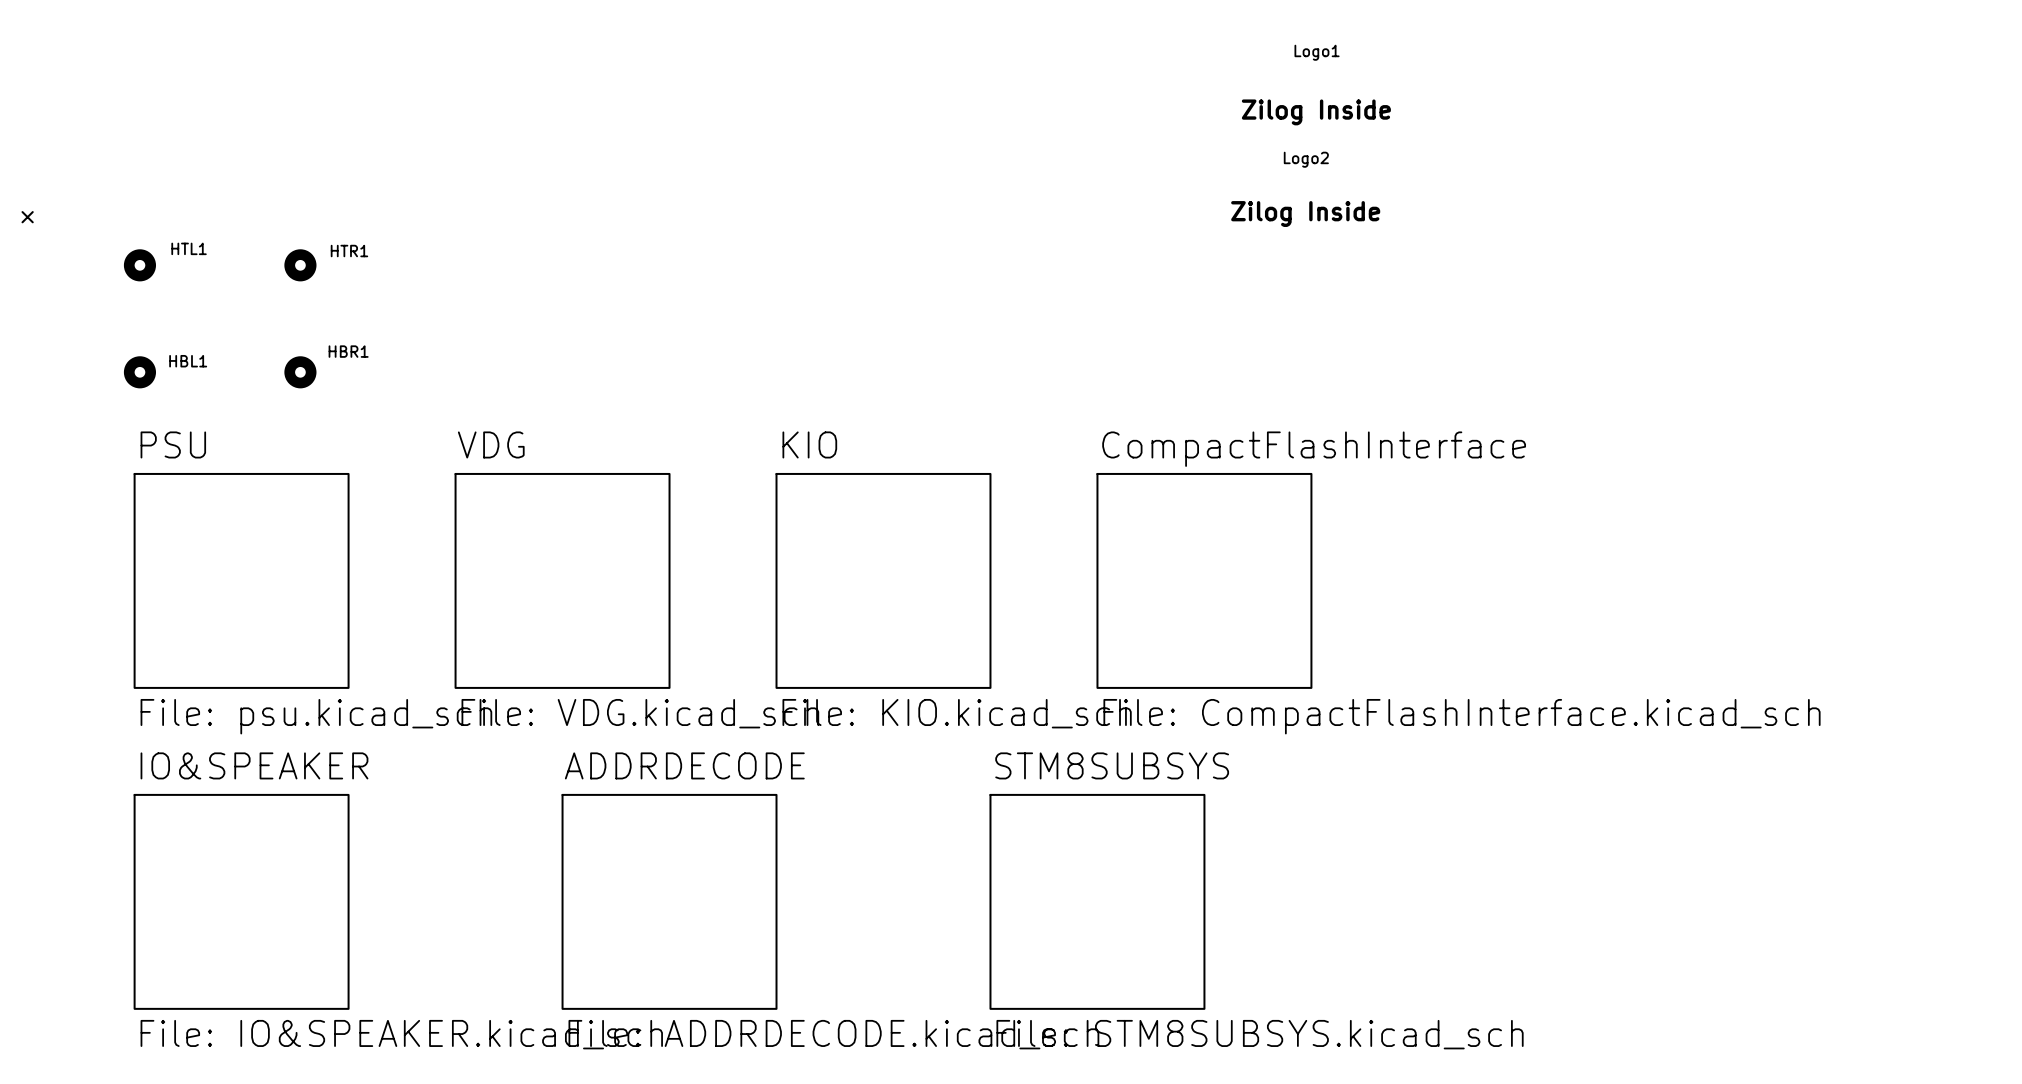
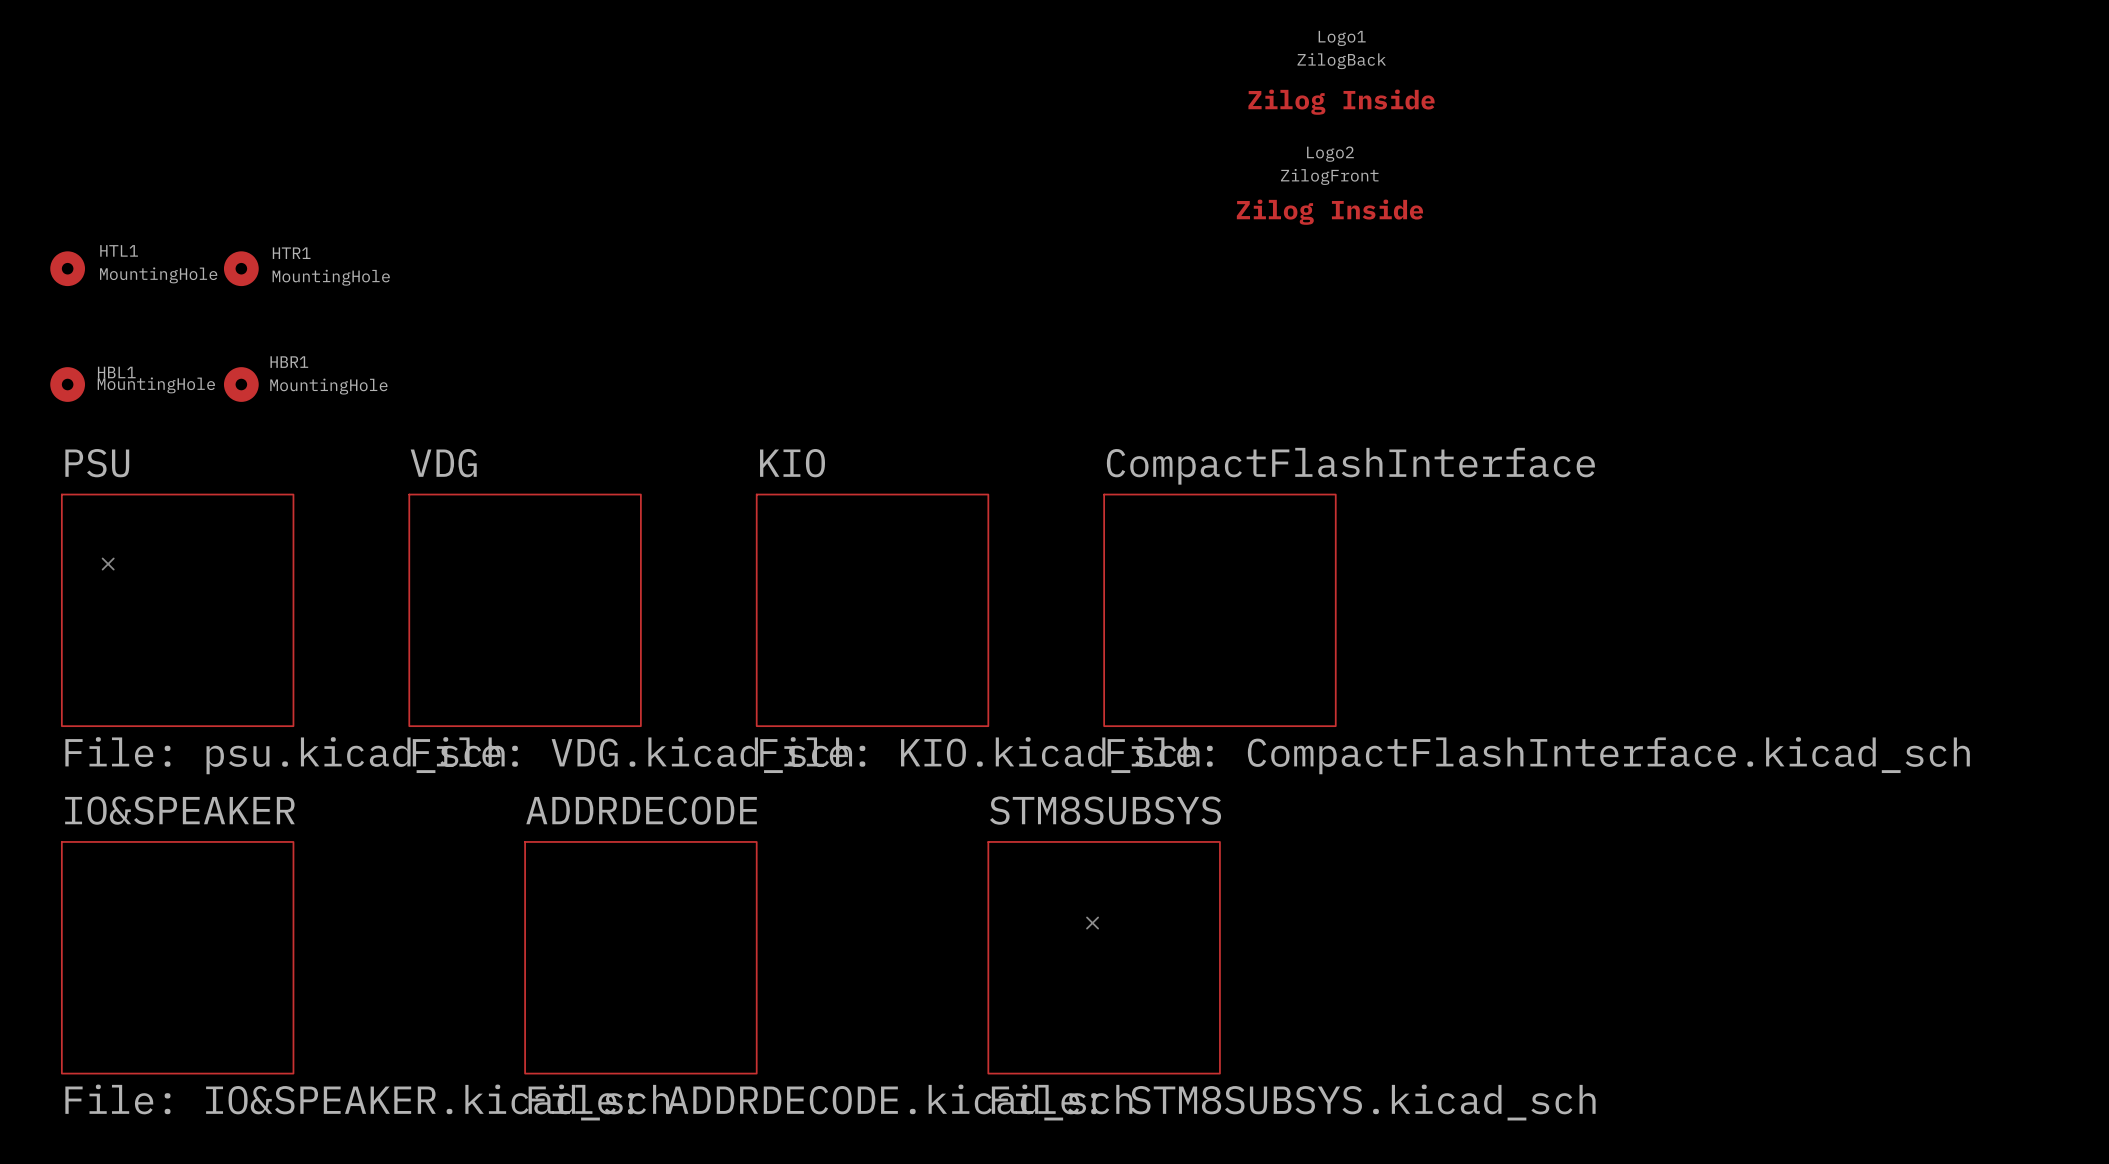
Logo1 value: none -> ZilogBack (1341, 61)
Logo2 value: none -> ZilogFront (1329, 176)
HTL1 value: none -> MountingHole (158, 275)
HTR1 value: none -> MountingHole (331, 277)
HBL1 value: none -> MountingHole (156, 385)
HBR1 value: none -> MountingHole (328, 386)
no-connect mark: none -> (108, 564)
no-connect mark: none -> (1092, 923)

